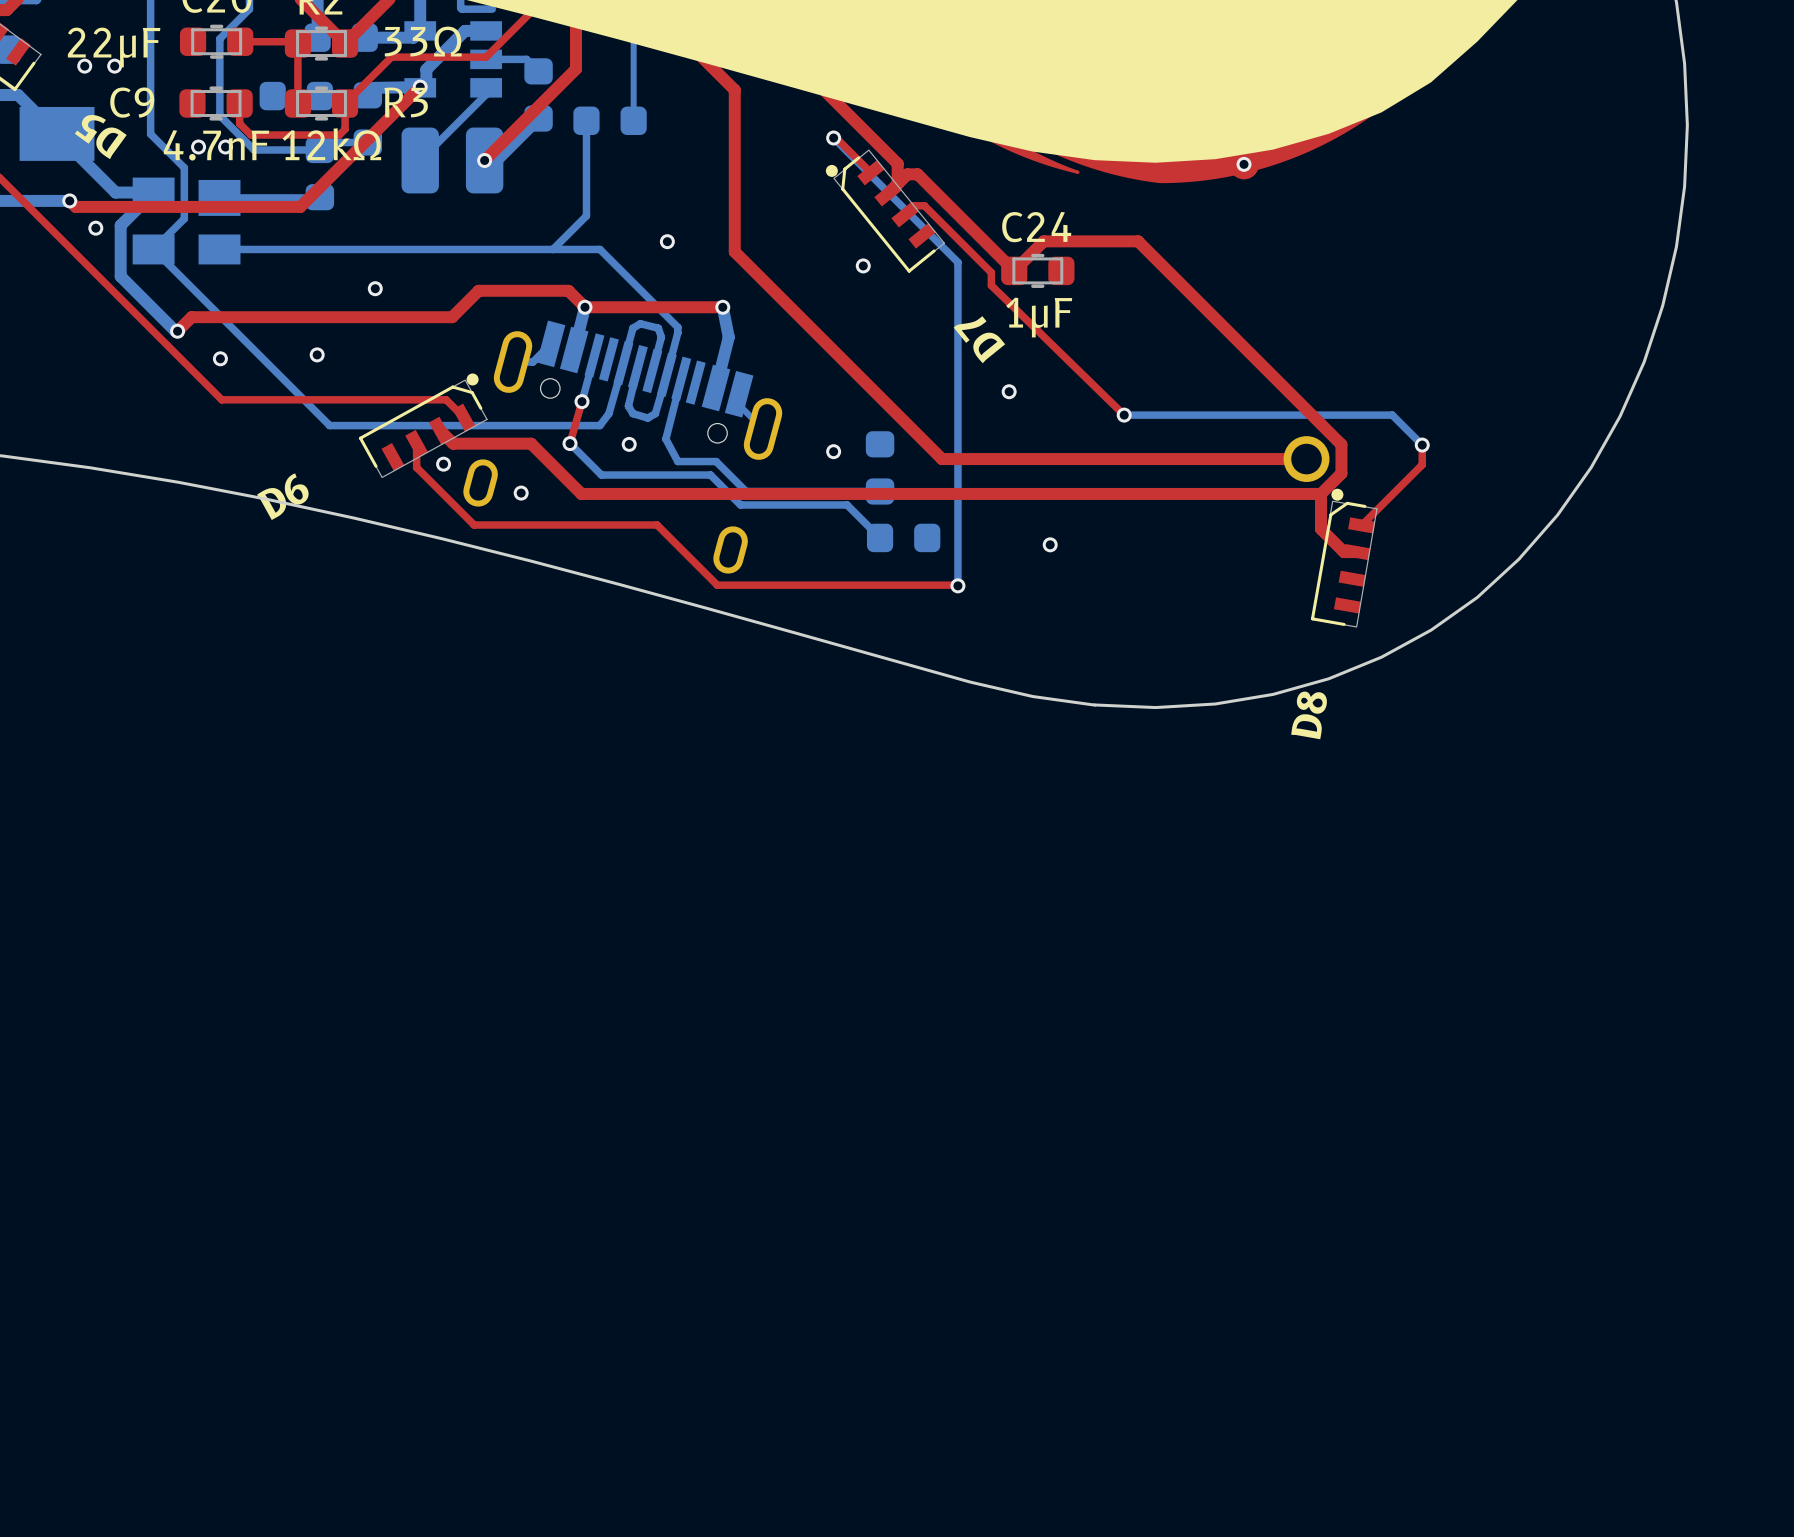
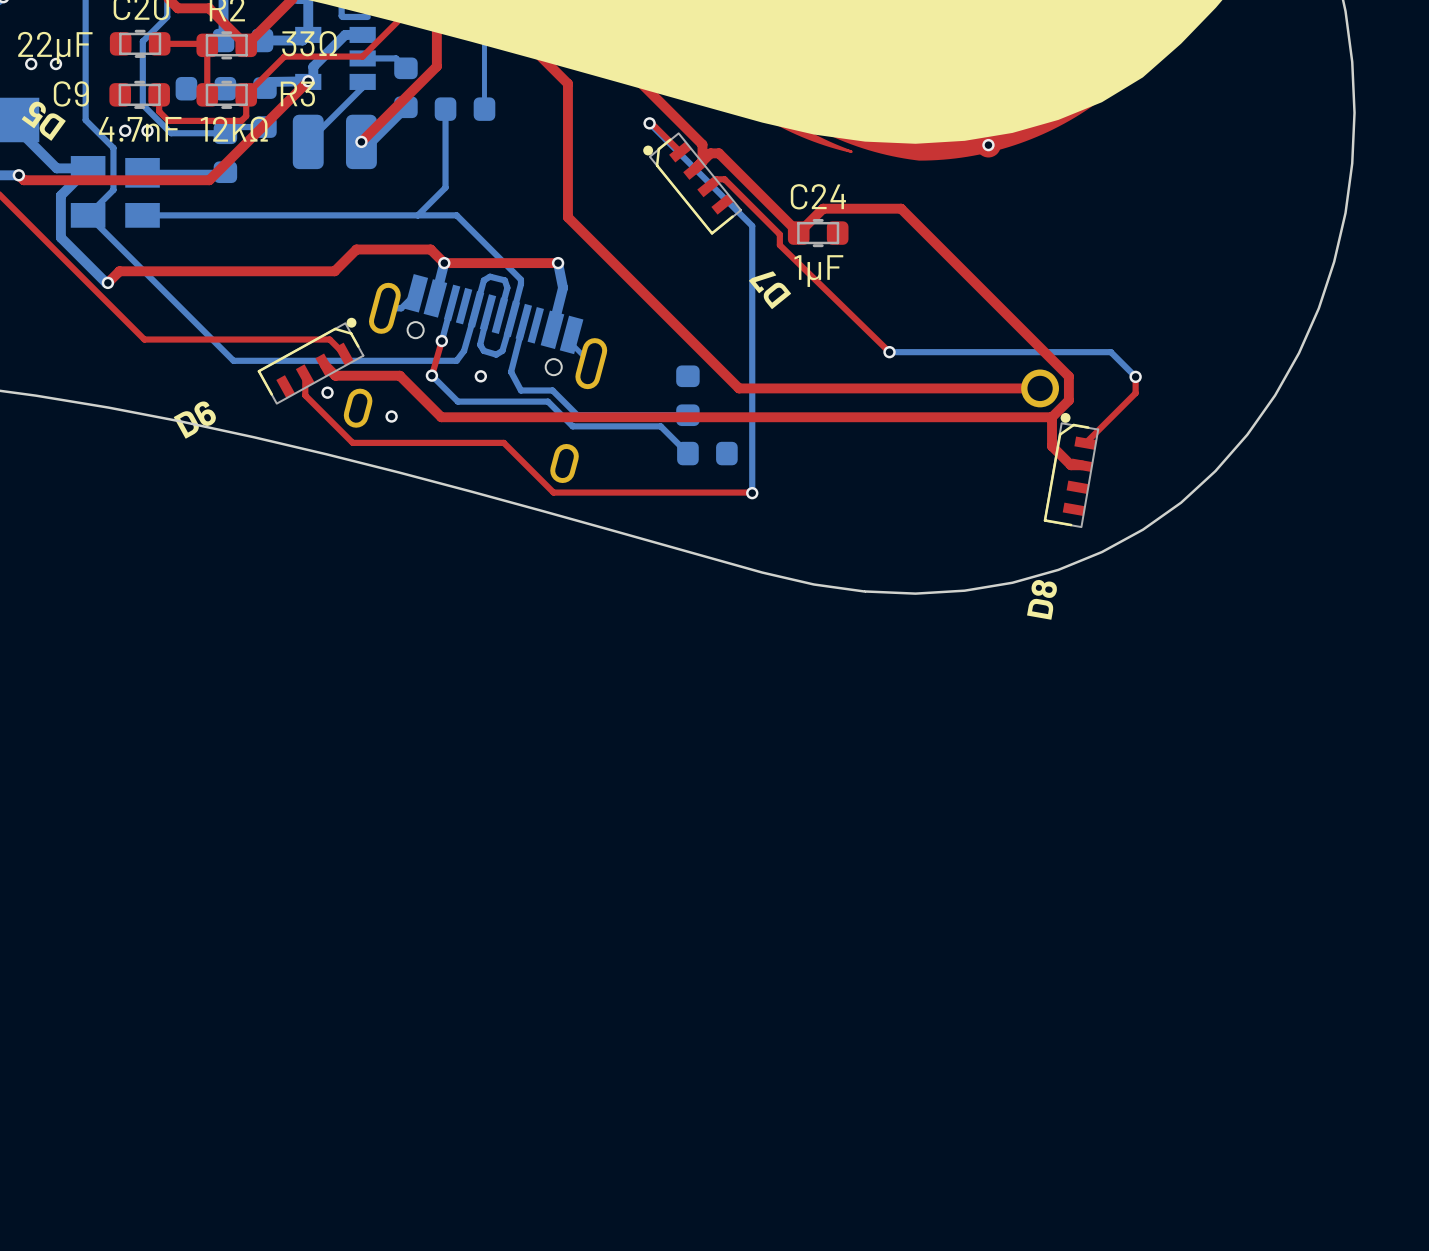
via: (95, 228) -> none
via: (667, 241) -> none
via: (863, 265) -> none
via: (375, 288) -> none
via: (317, 354) -> none
via: (220, 358) -> none
via: (1009, 391) -> none
via: (833, 451) -> none
via: (1050, 544) -> none

